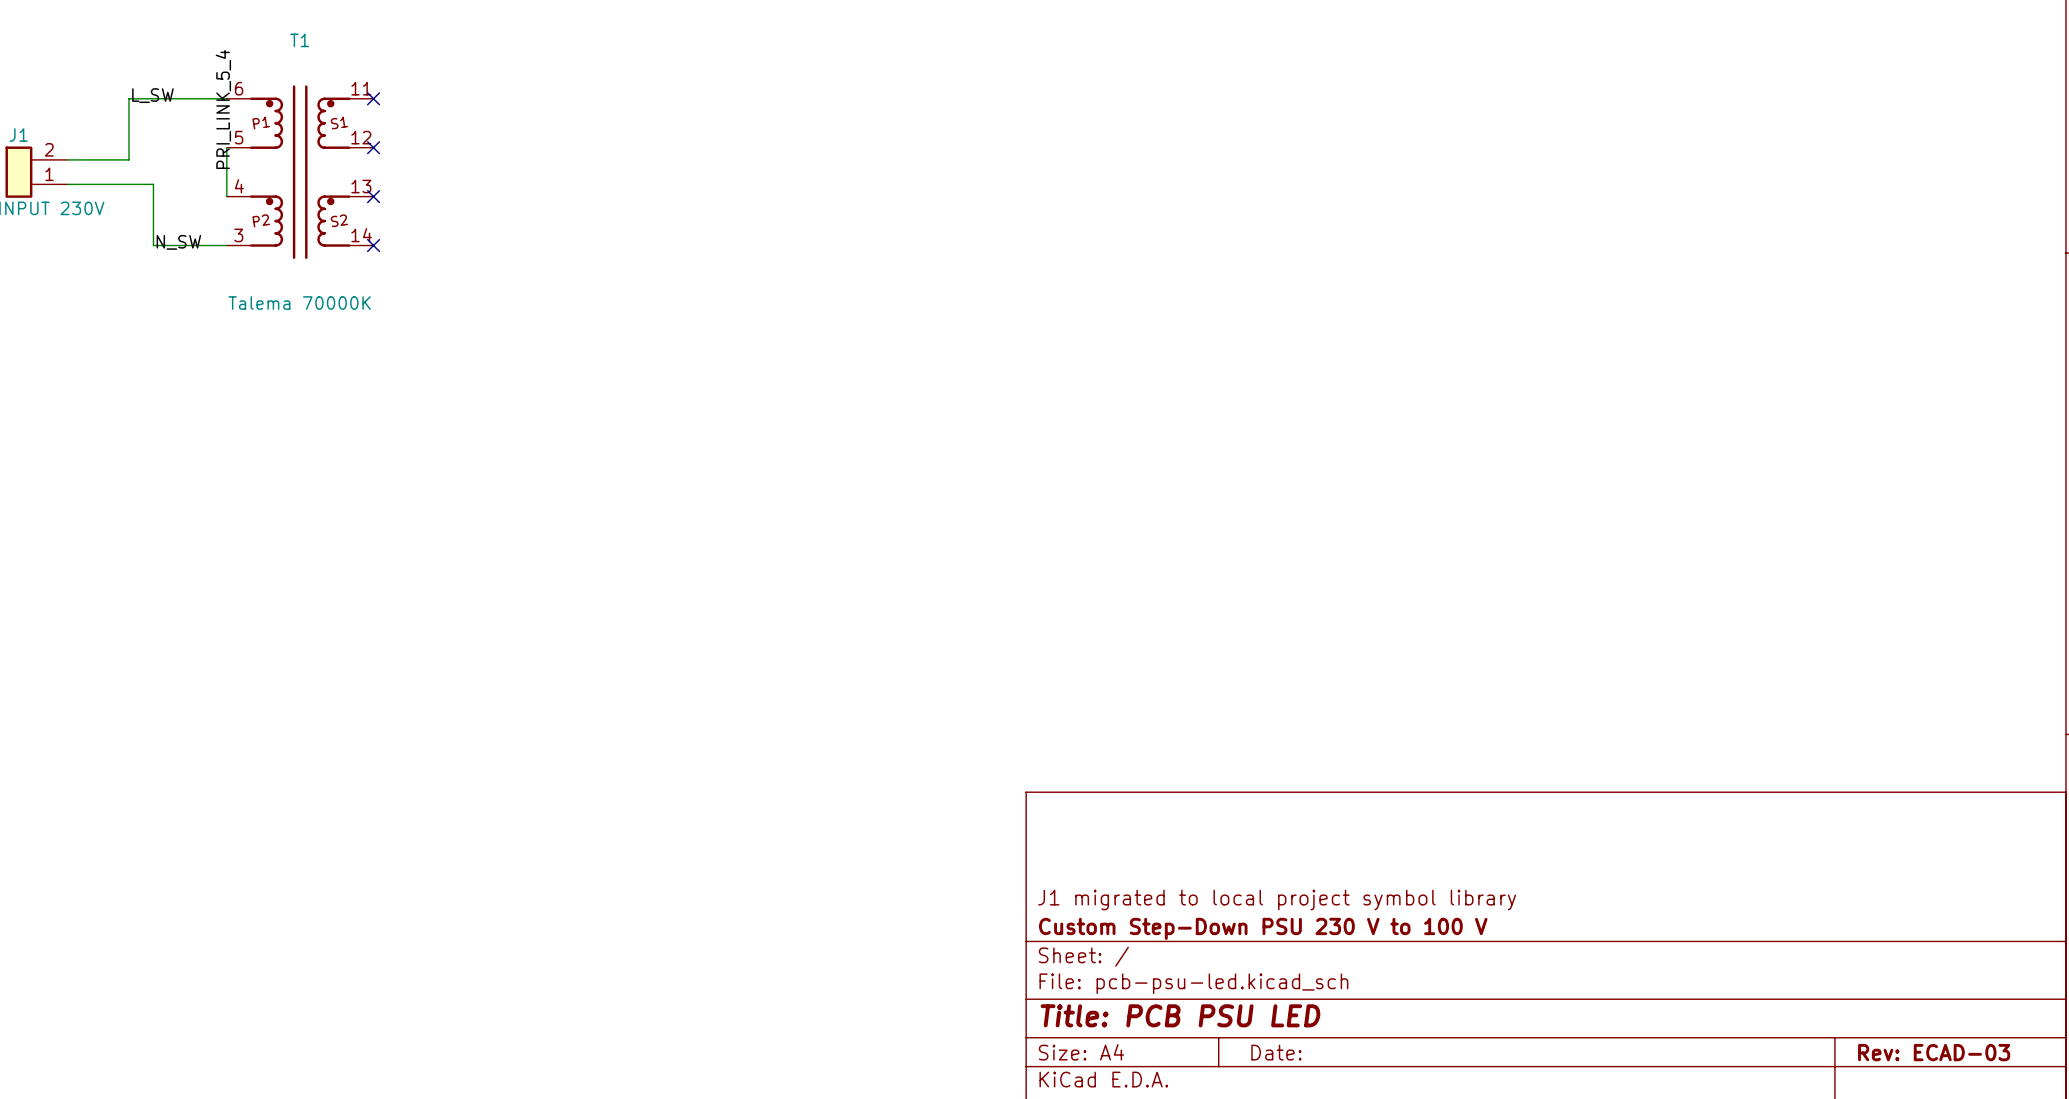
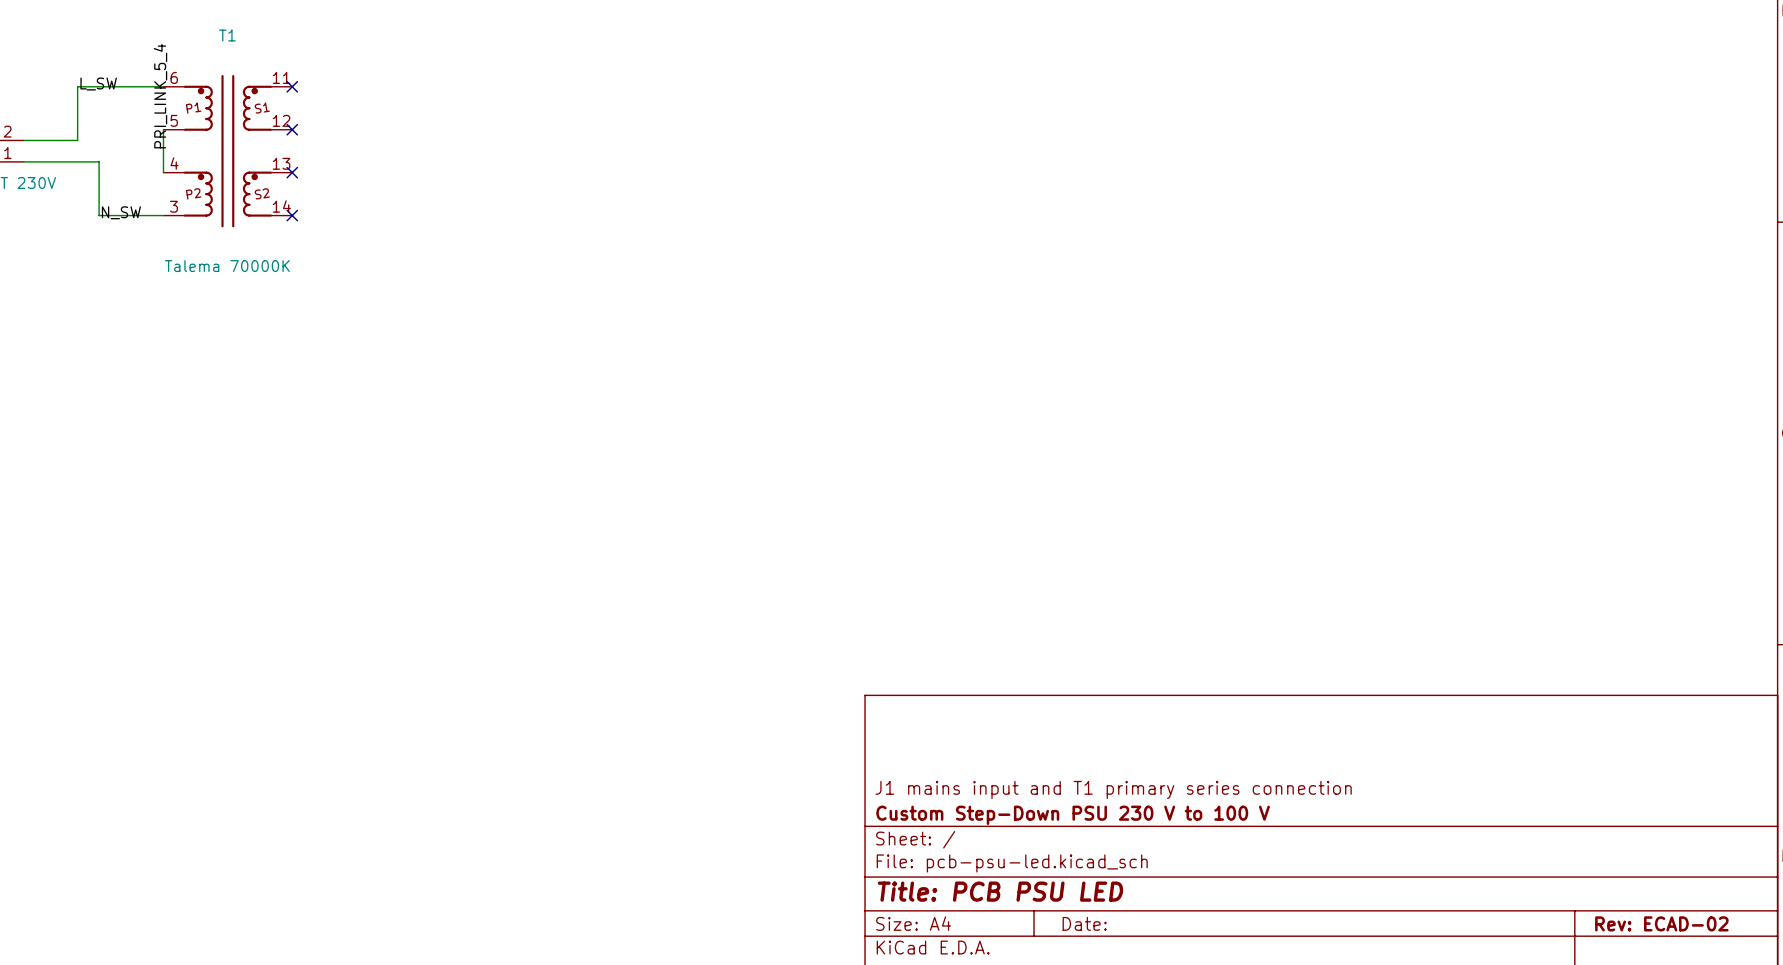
title block: J1 migrated to local project symbol library (1277, 899) -> J1 mains input and T1 primary series connection (1113, 789)
title block: Rev: ECAD-03 (1934, 1052) -> Rev: ECAD-02 (1661, 923)

